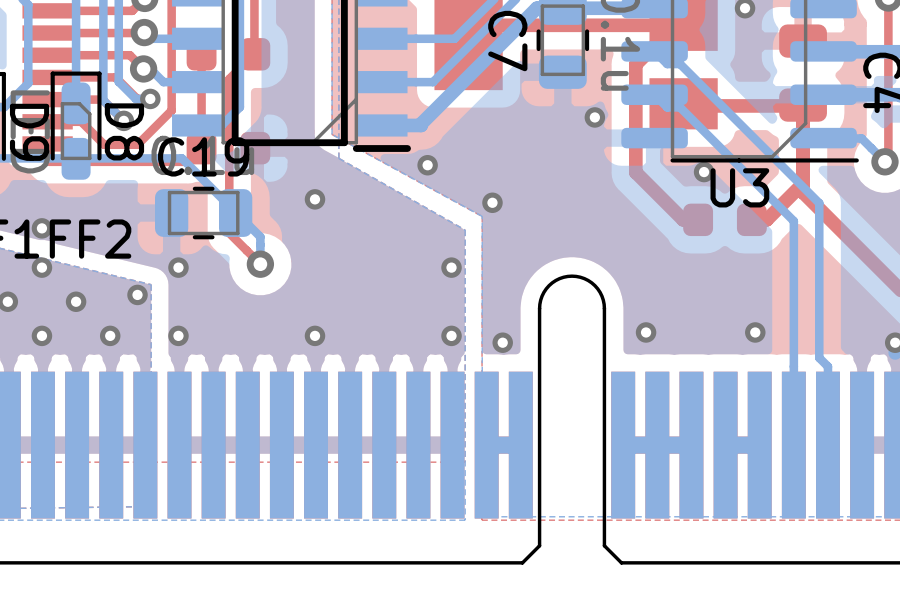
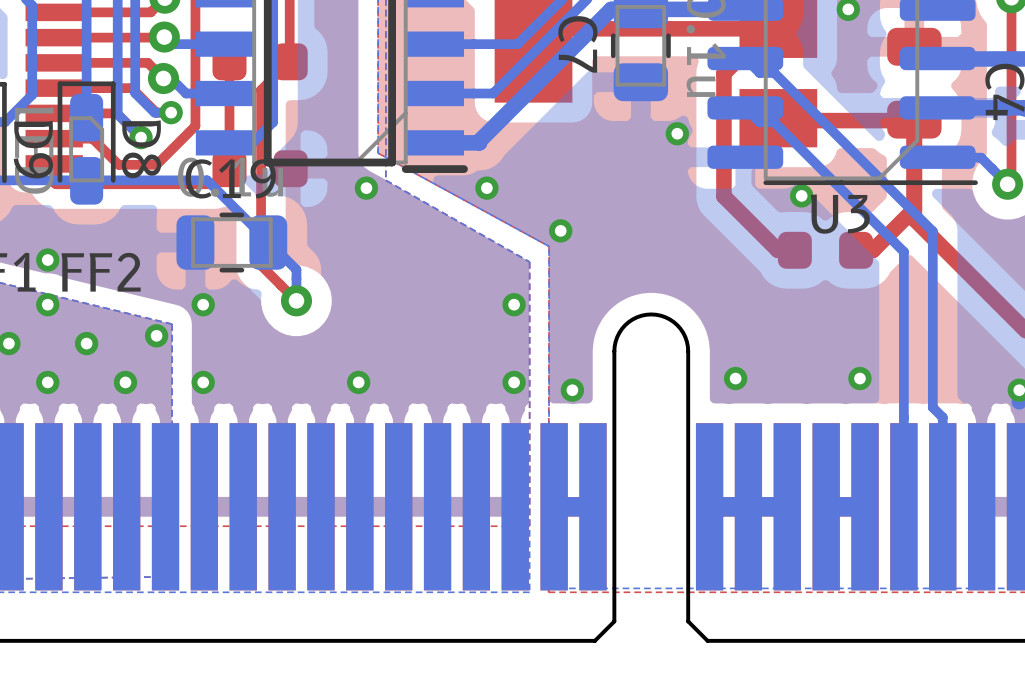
via position: (314, 199) -> (366, 188)

